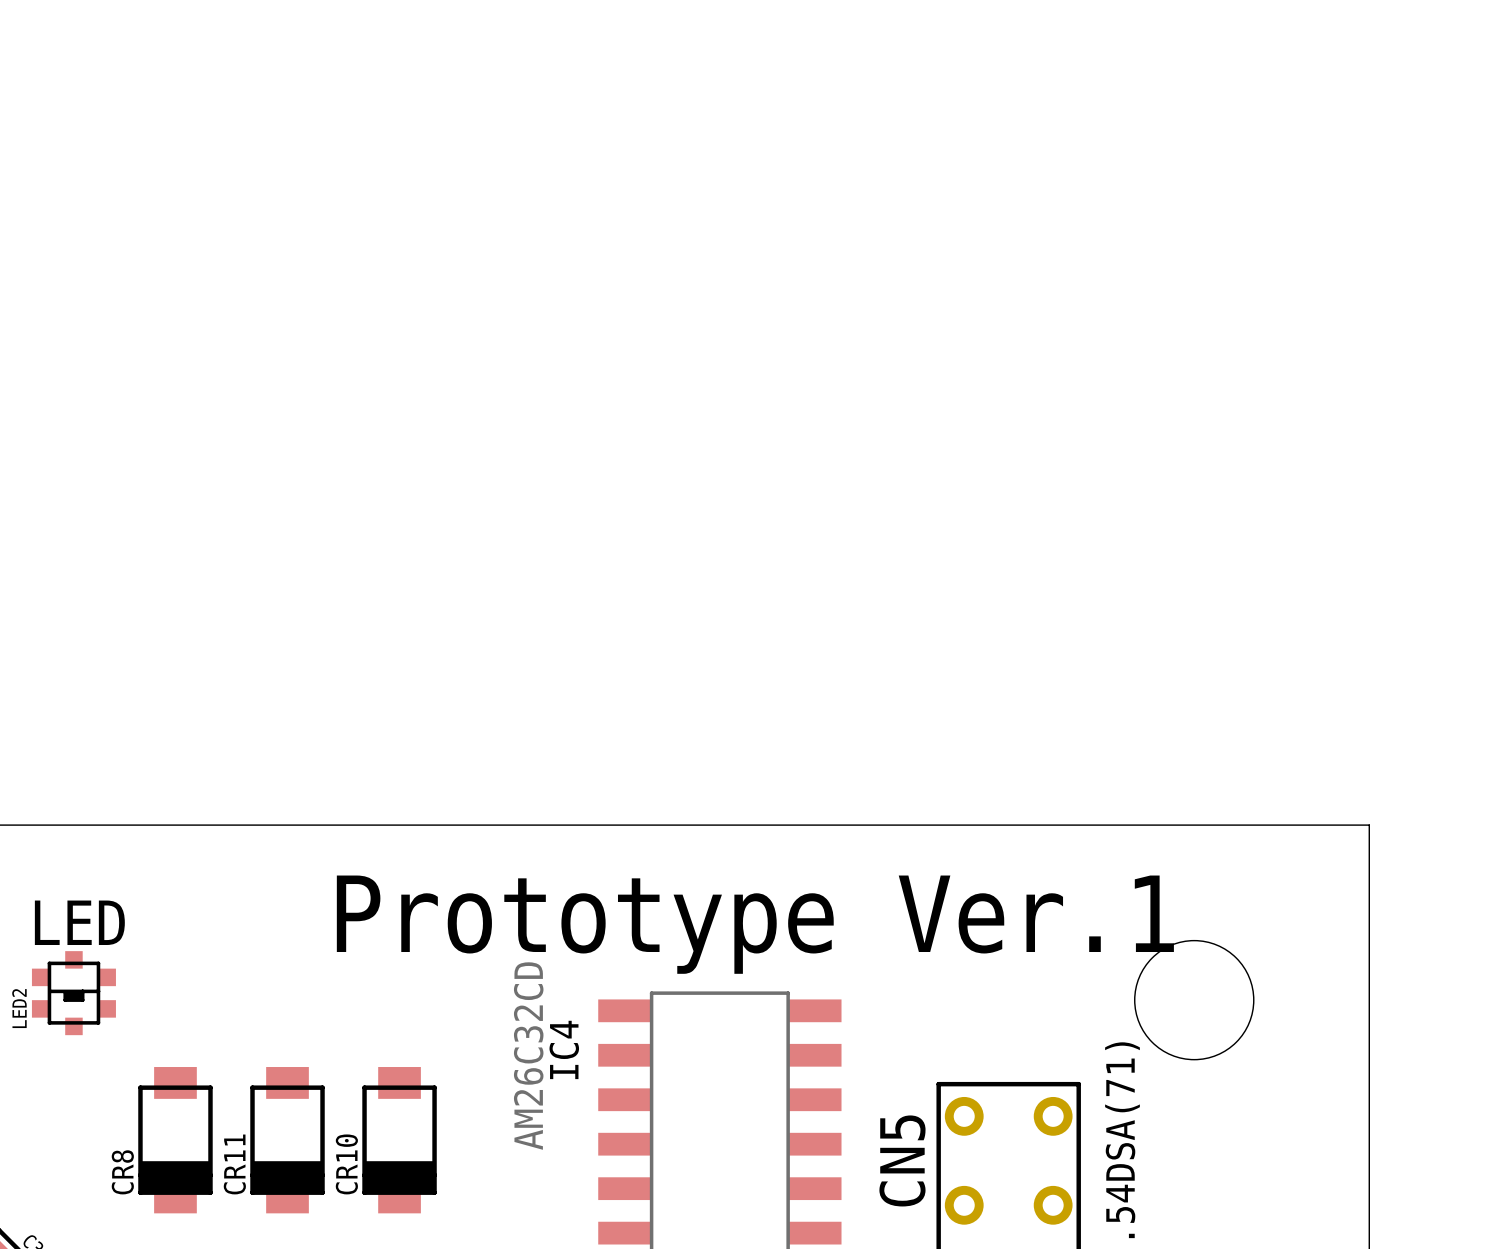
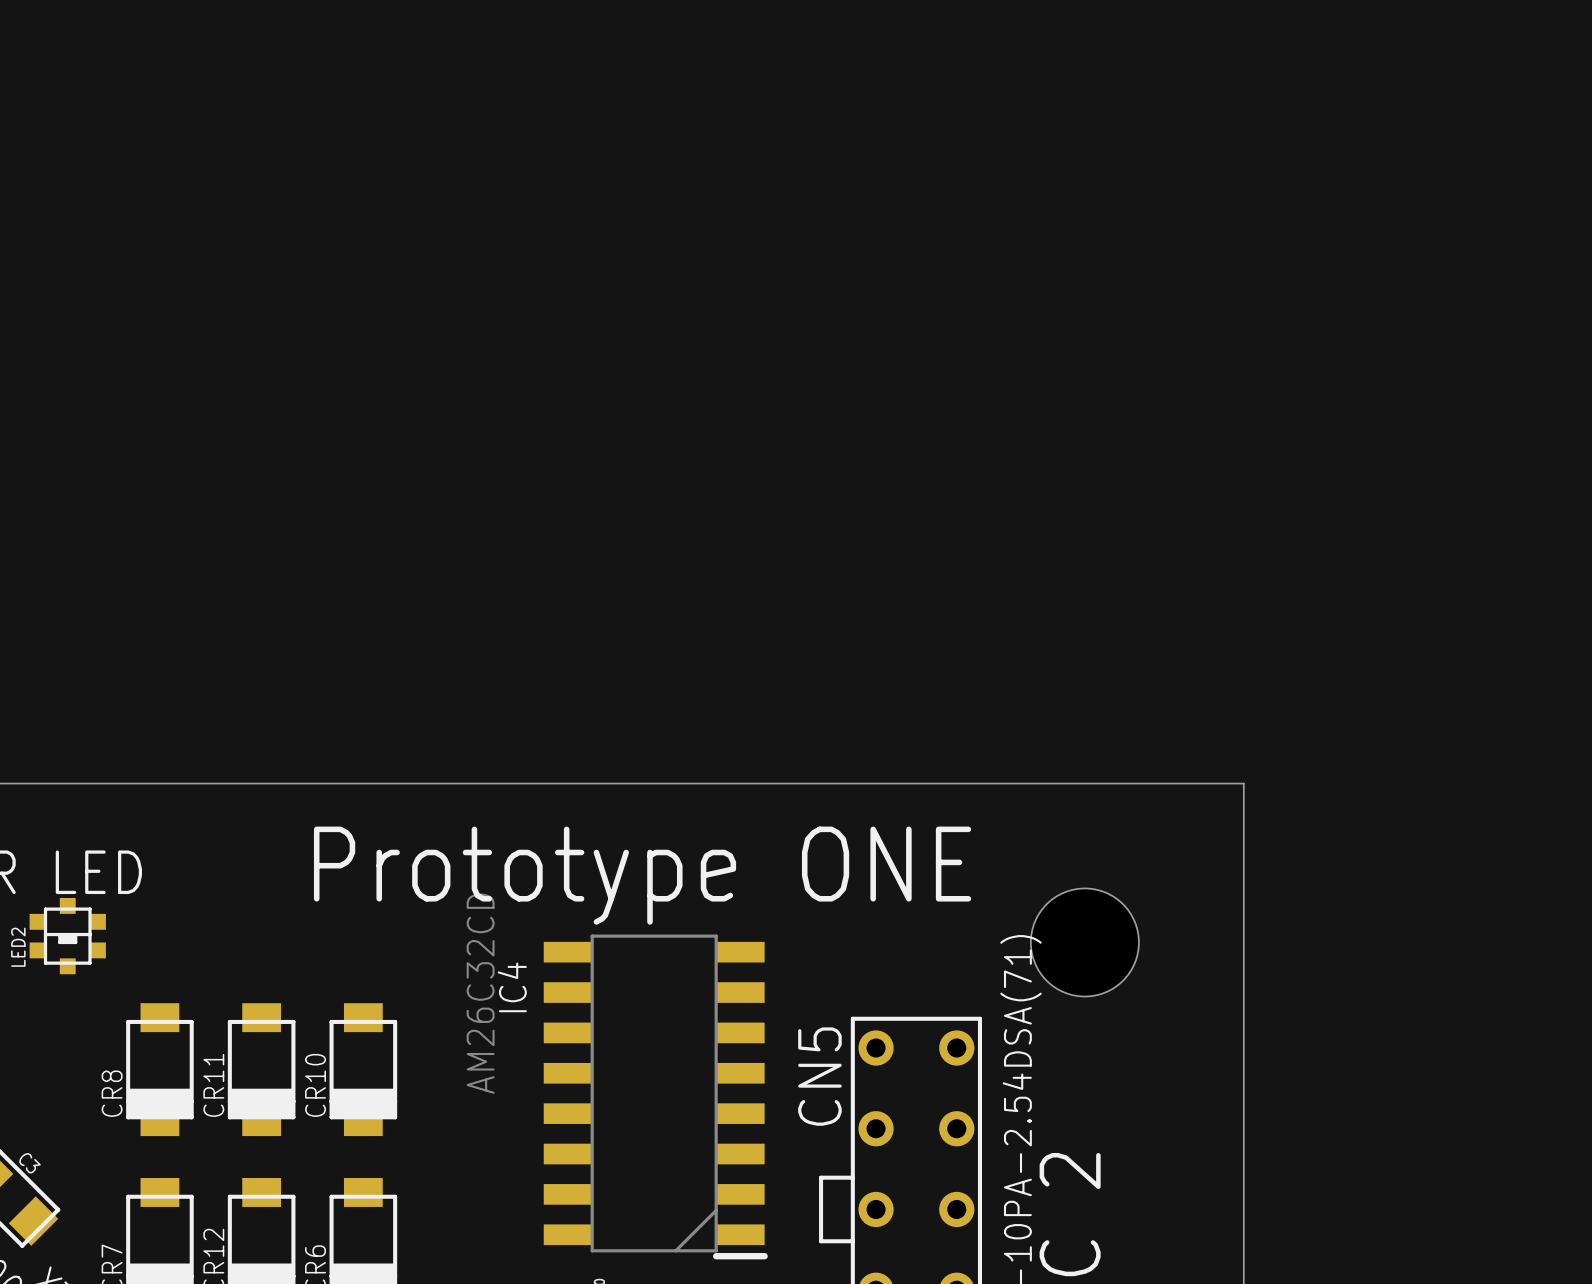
text: Prototype Ver.1 (755, 924) -> Prototype ONE (642, 875)

